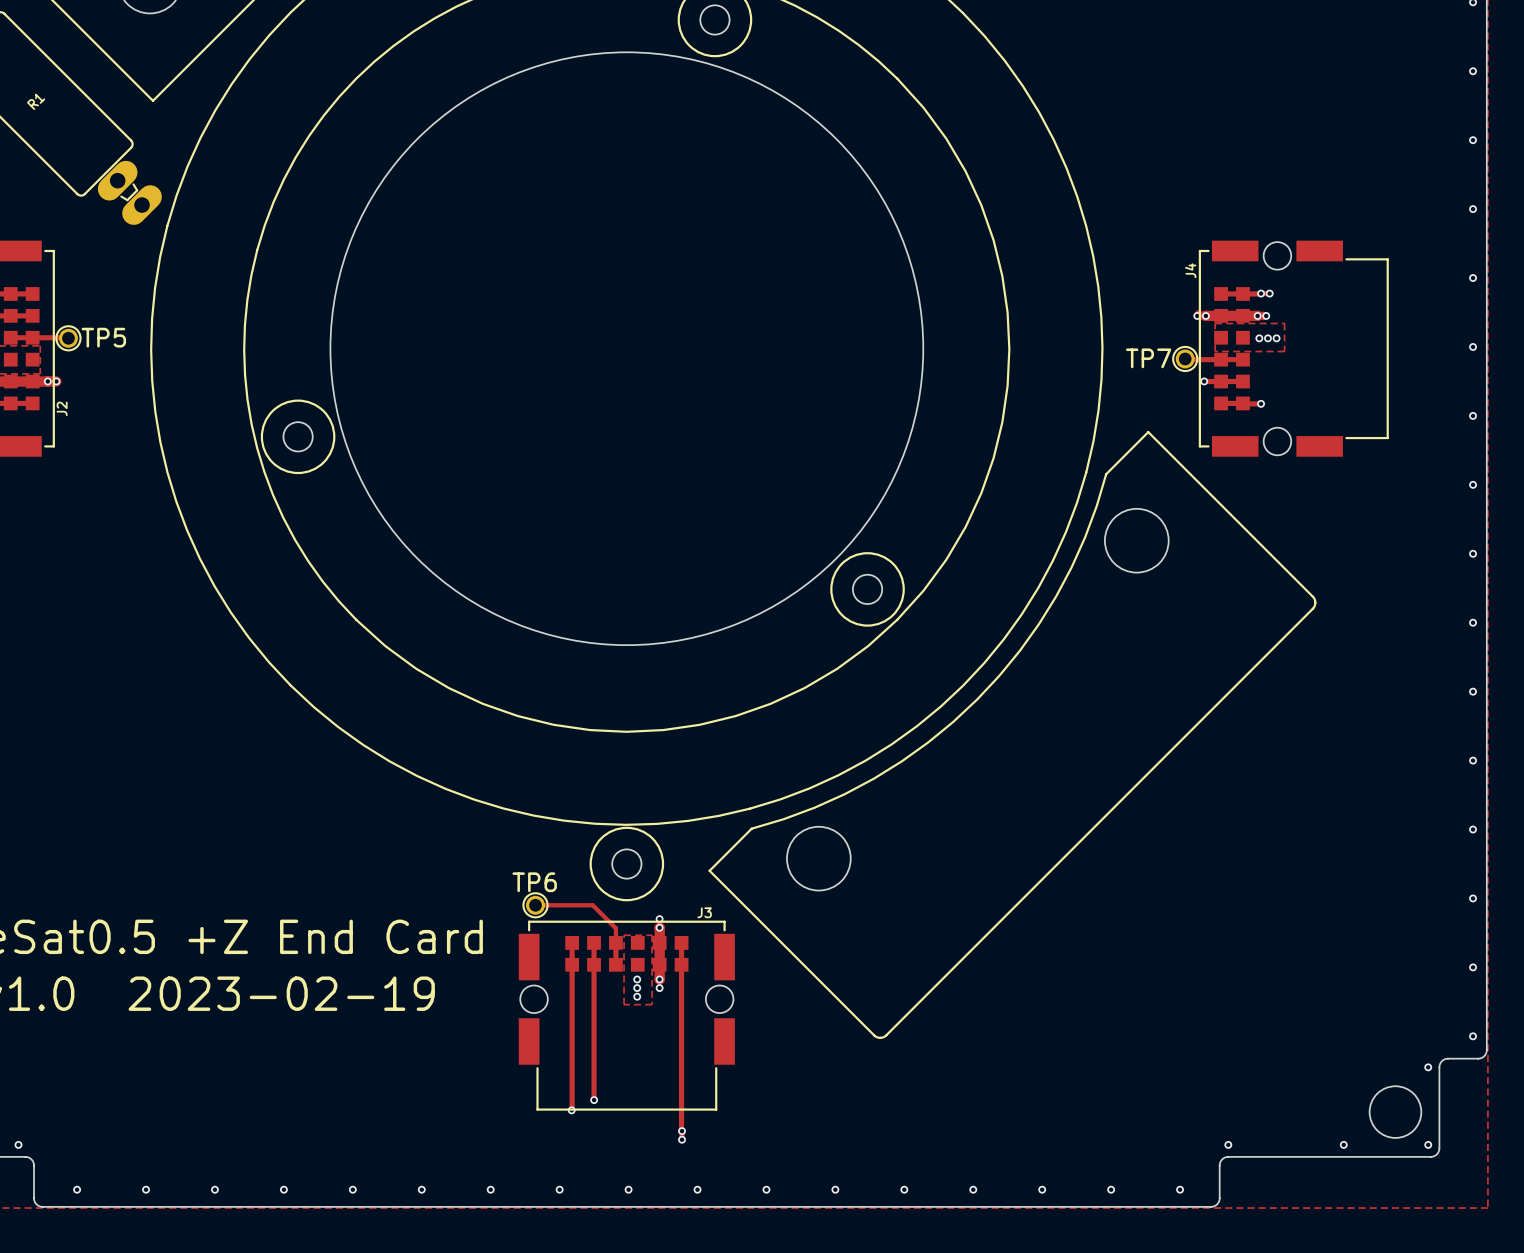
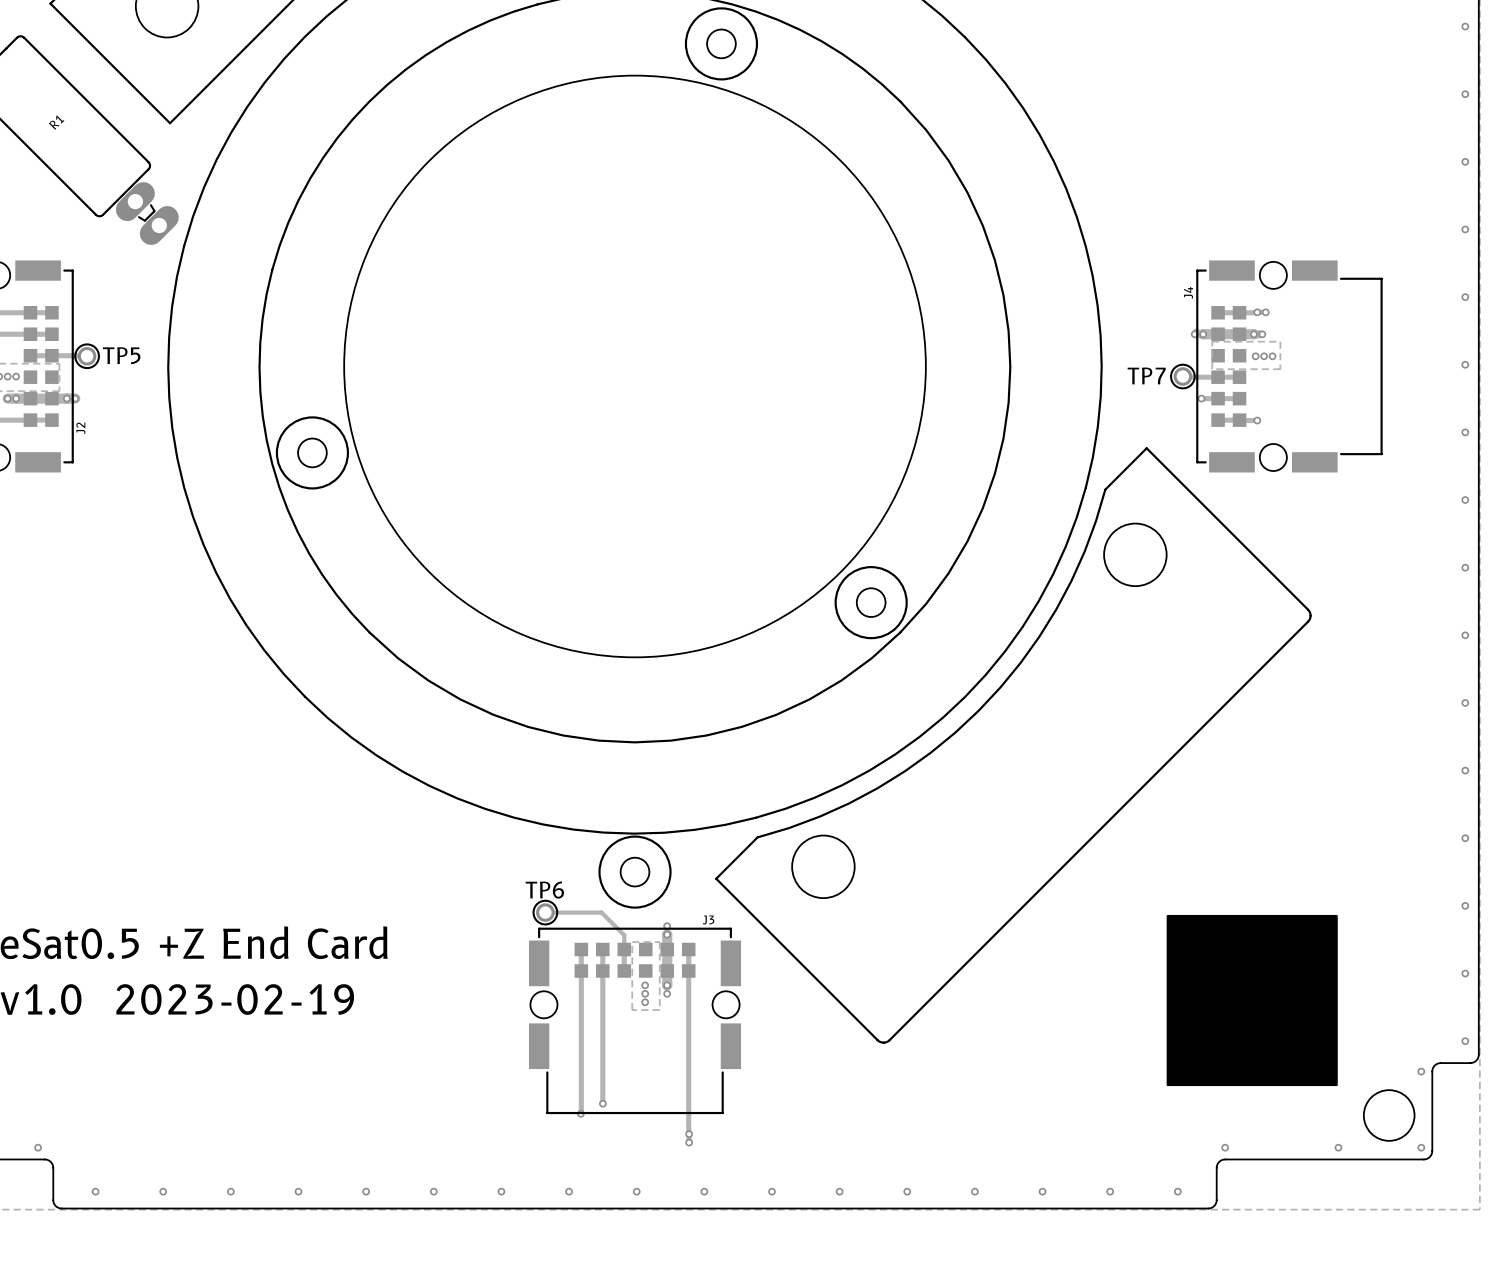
drawing: none -> [1166, 914, 1338, 1087]

